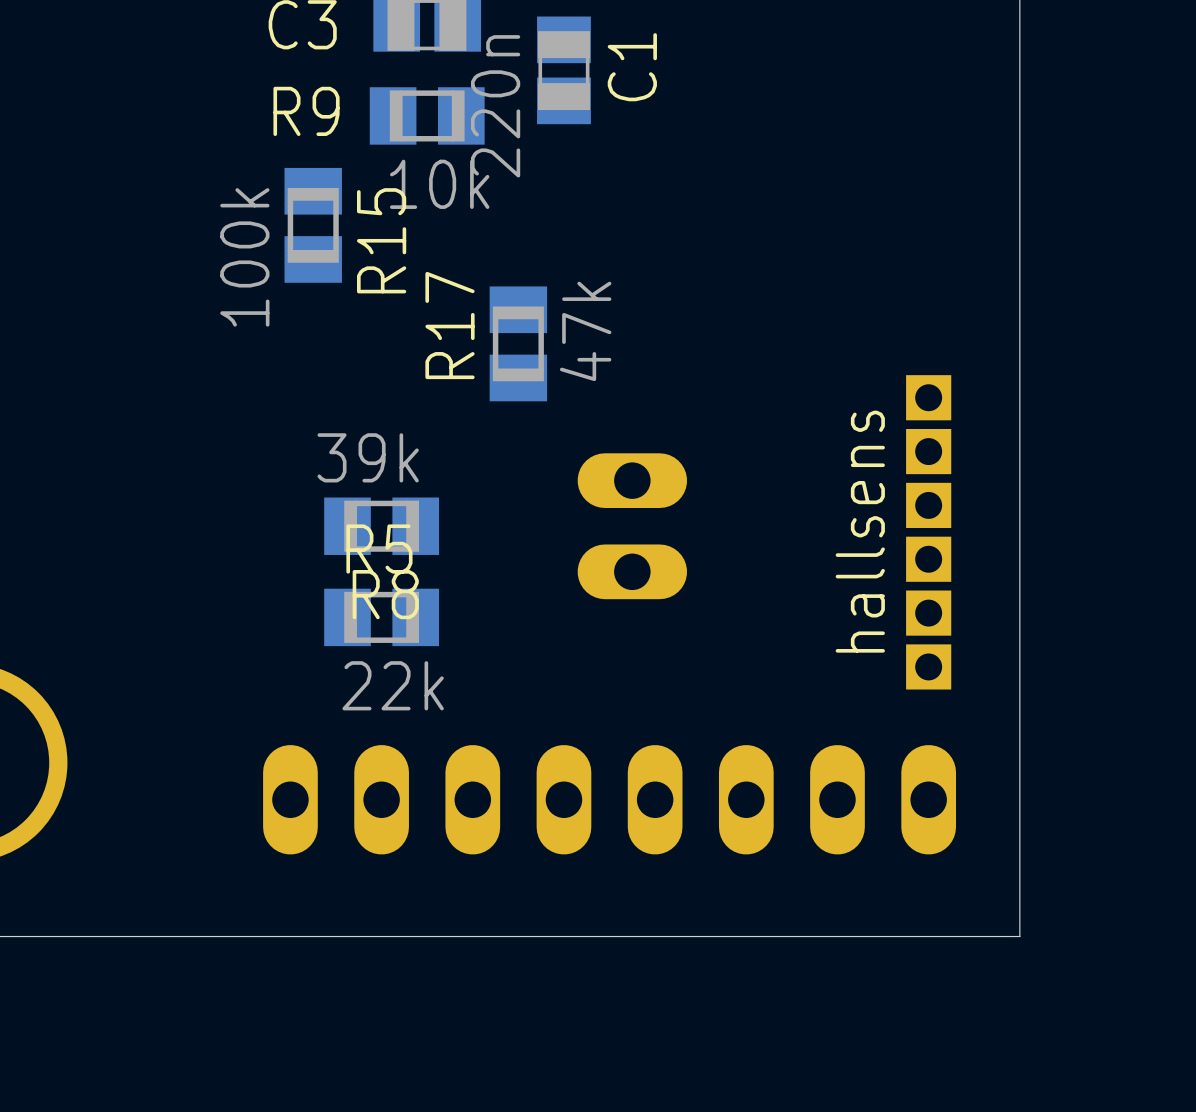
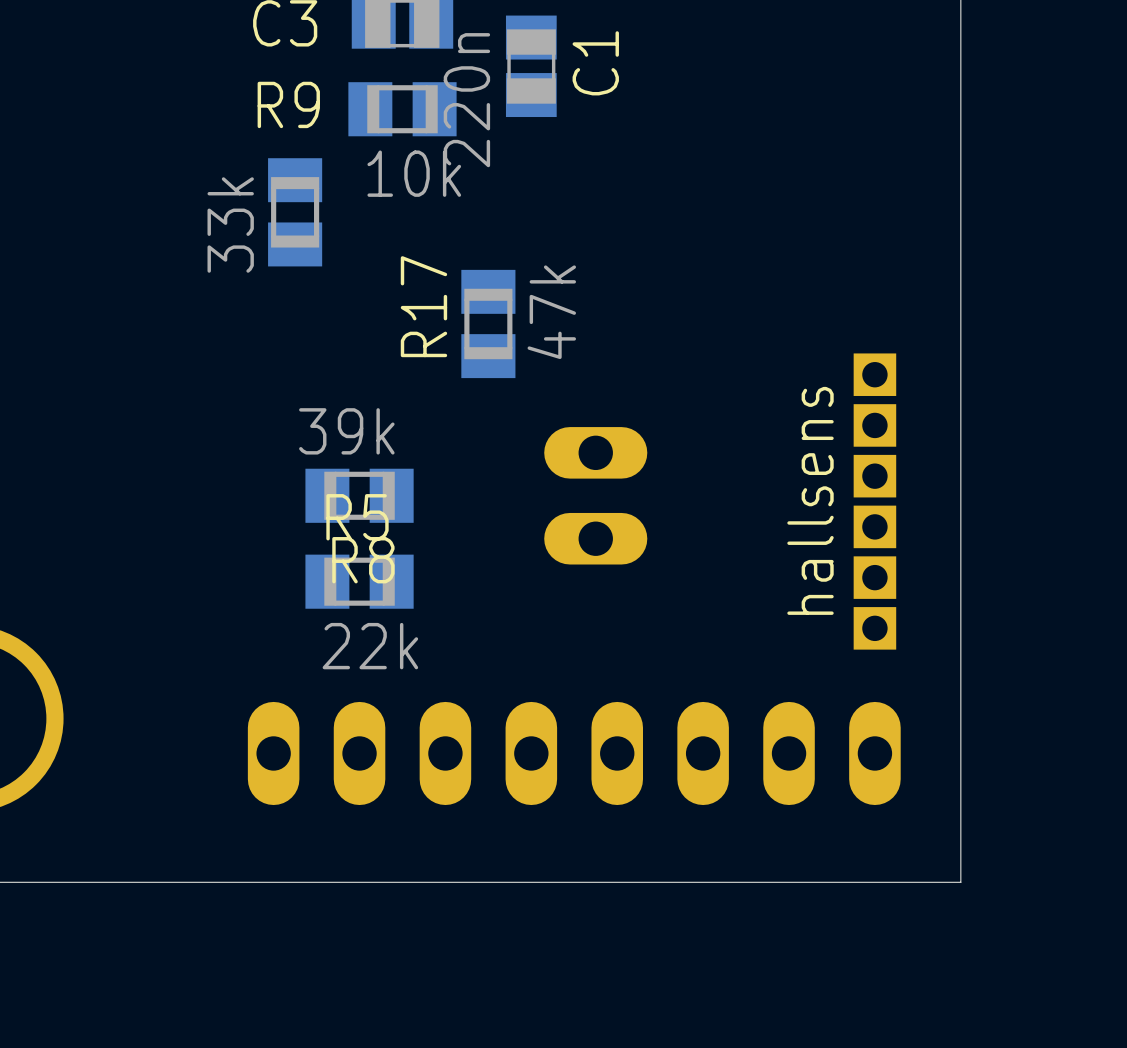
R15 name: R15 (381, 240) -> none
R15 value: 100k (244, 257) -> 33k (230, 225)

